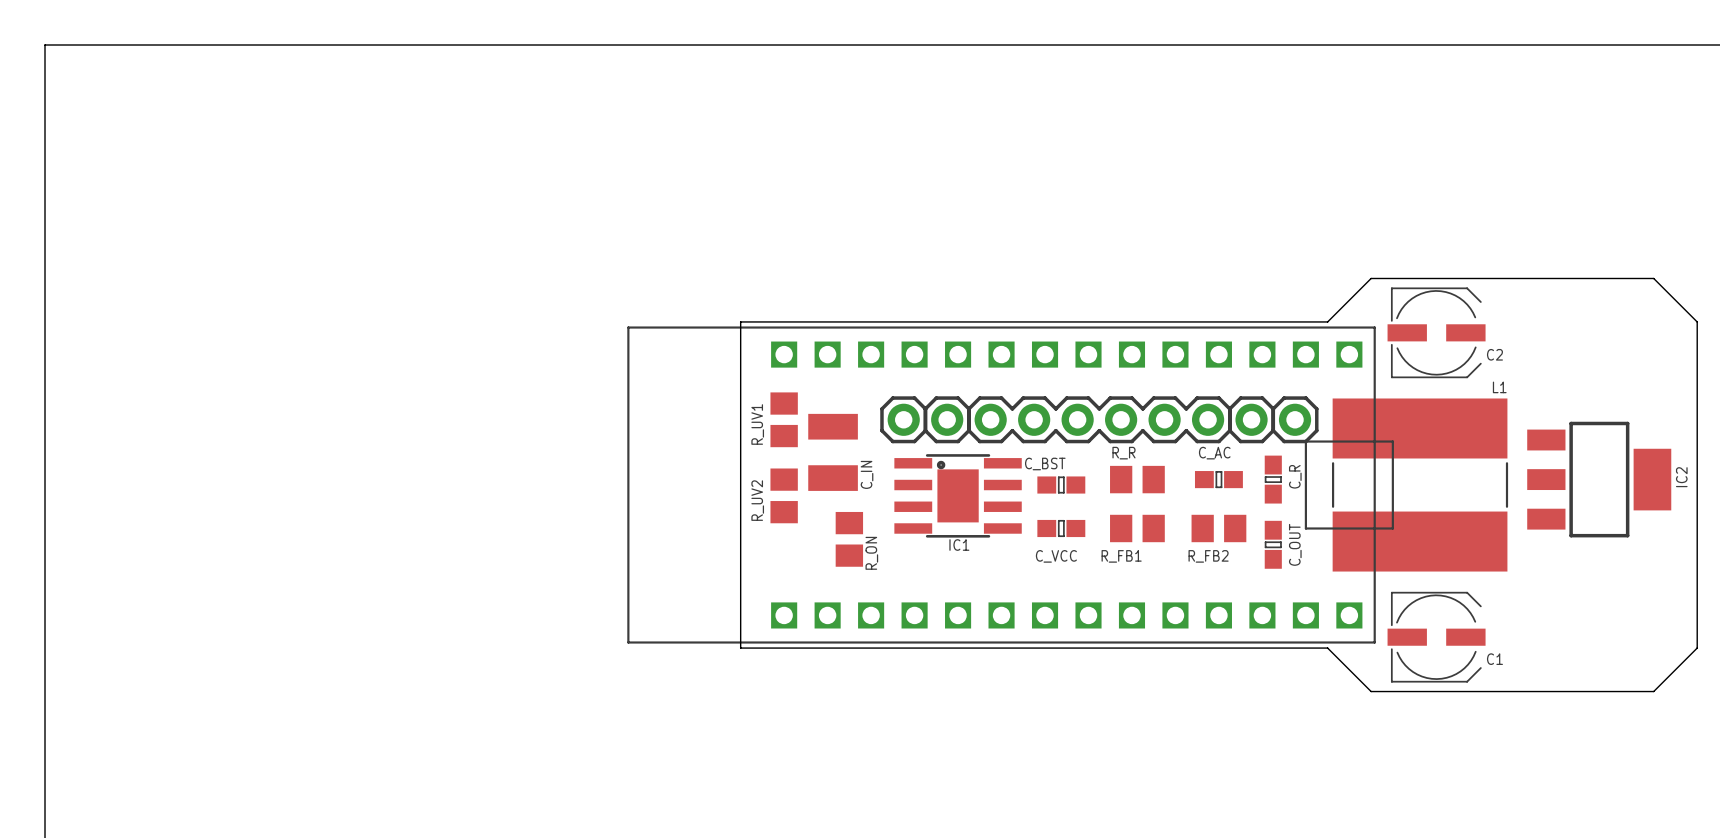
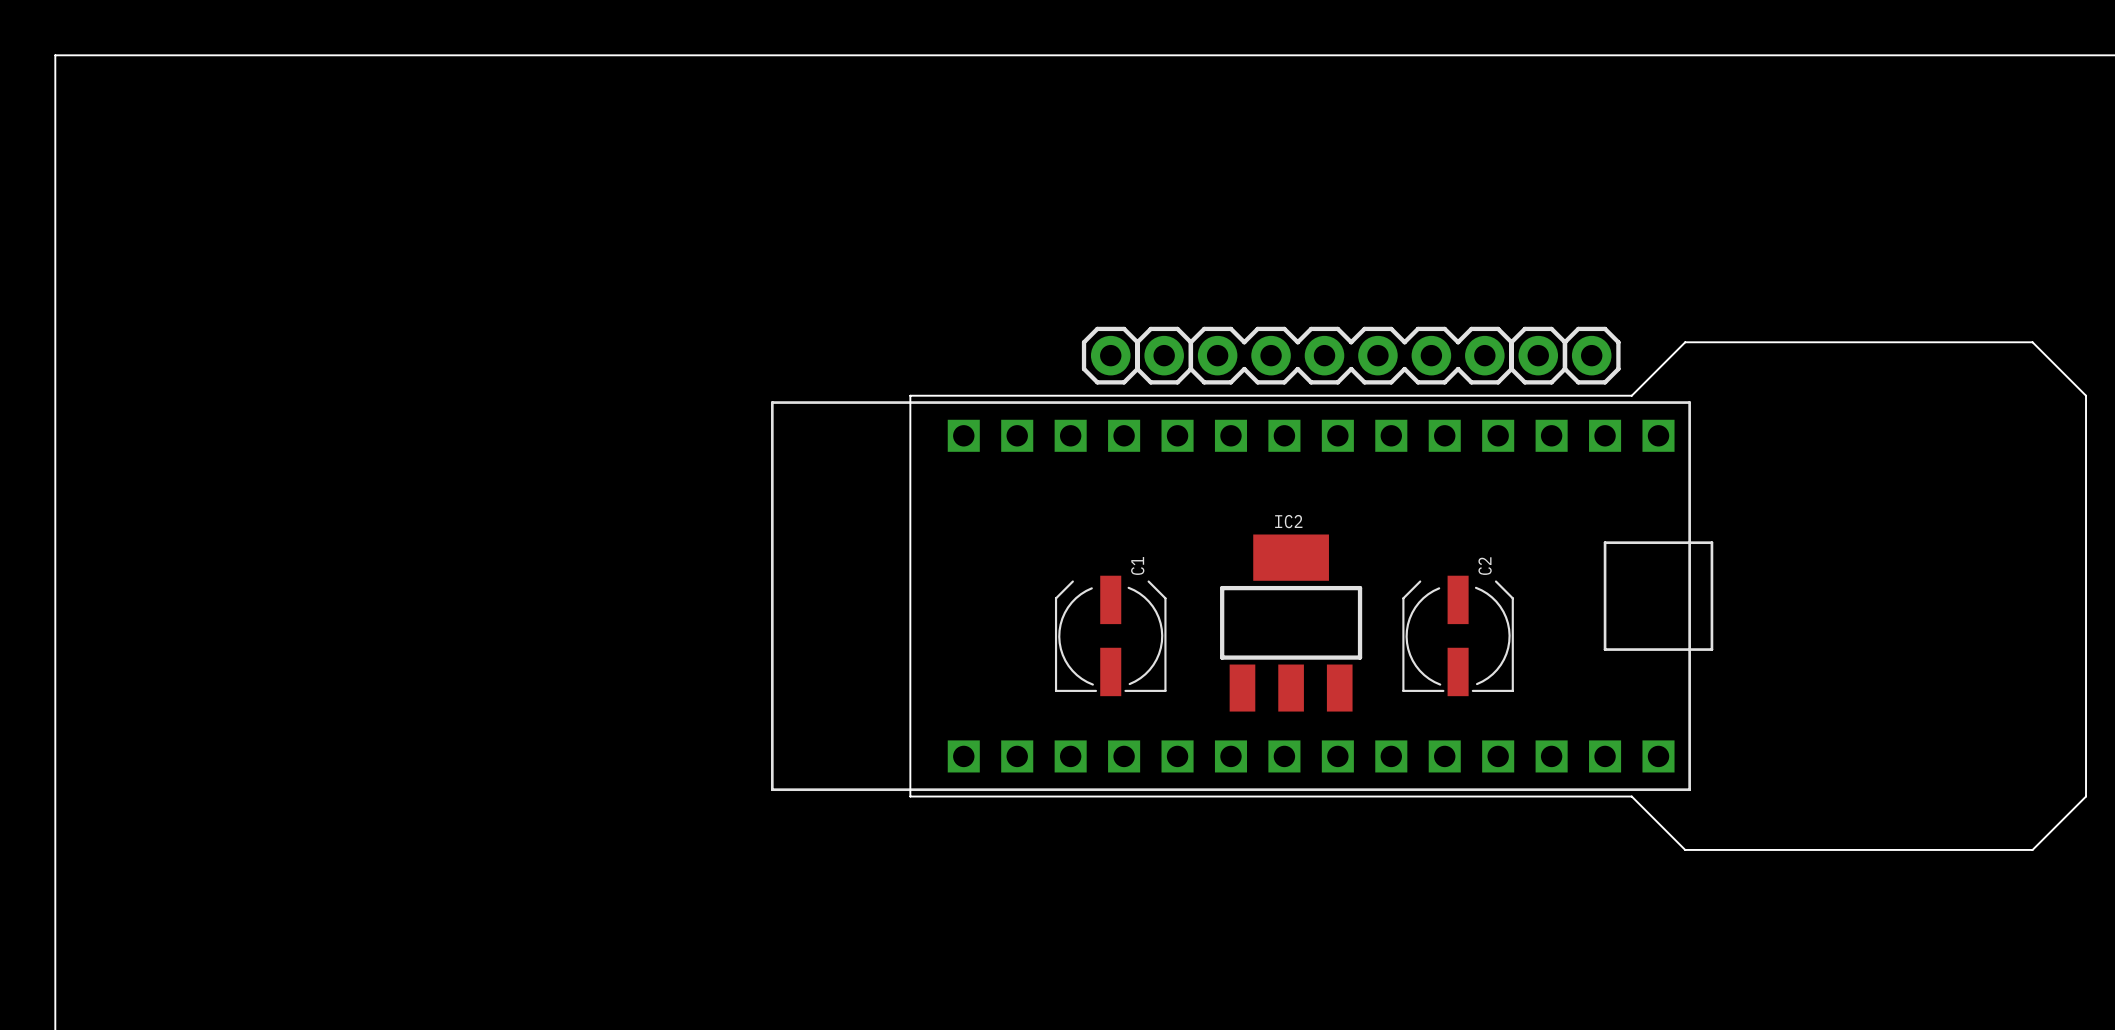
part: none -> (1110, 355)
part: none -> (1164, 355)
part: none -> (1538, 355)
part: none -> (1591, 355)
C2 rotation: 0° (1436, 332) -> 90° counterclockwise (1458, 635)
C2 position: (1436, 332) -> (1458, 635)
R_UV1: (784, 419) -> none
part: (903, 419) -> none
part: (947, 419) -> none
part position: (1099, 419) -> (1351, 355)
part: (1251, 419) -> none
part: (1295, 419) -> none
C_IN: (833, 452) -> none
R_R: (1137, 479) -> none
C_AC: (1218, 479) -> none
C_R: (1273, 479) -> none
IC2 rotation: 0° (1599, 479) -> 90° counterclockwise (1291, 623)
IC2 position: (1599, 479) -> (1291, 623)
C_BST: (1061, 485) -> none
L1: (1420, 485) -> none
R_UV2: (784, 495) -> none
IC1: (958, 495) -> none
C_VCC: (1061, 528) -> none
R_FB1: (1137, 528) -> none
R_FB2: (1218, 528) -> none
R_ON: (849, 539) -> none
C_OUT: (1273, 544) -> none
C1 rotation: 0° (1436, 637) -> 90° counterclockwise (1110, 635)
C1 position: (1436, 637) -> (1110, 635)

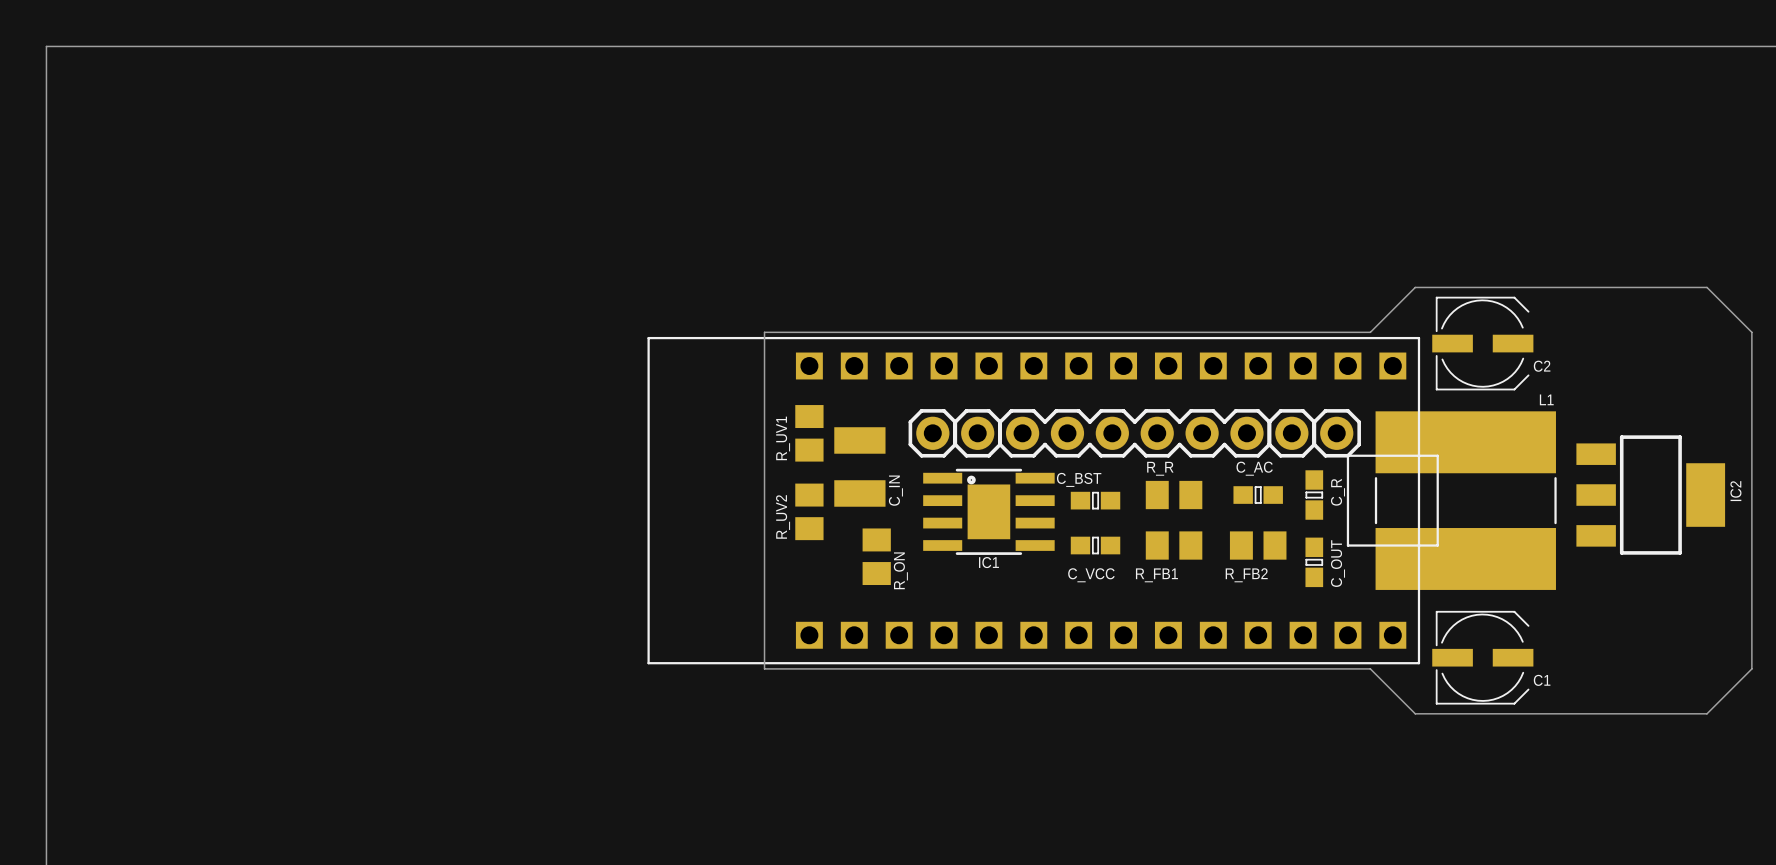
part: (1110, 355) -> none
part: (1164, 355) -> none
part position: (1351, 355) -> (1134, 433)
part: (1538, 355) -> none
part: (1591, 355) -> none
R_UV1: none -> (809, 433)
part: none -> (932, 433)
part: none -> (977, 433)
part: none -> (1291, 433)
part: none -> (1336, 433)
C_IN: none -> (859, 466)
R_R: none -> (1174, 495)
C_AC: none -> (1258, 495)
C_R: none -> (1314, 495)
C_BST: none -> (1095, 500)
L1: none -> (1465, 500)
R_UV2: none -> (809, 511)
IC1: none -> (988, 511)
IC2 rotation: 0° (1291, 623) -> 90° clockwise (1650, 495)
IC2 position: (1291, 623) -> (1650, 495)
C1 rotation: 0° (1110, 635) -> 90° clockwise (1482, 657)
C1 position: (1110, 635) -> (1482, 657)
C2 rotation: 0° (1458, 635) -> 90° clockwise (1482, 343)
C2 position: (1458, 635) -> (1482, 343)
C_VCC: none -> (1095, 545)
R_FB1: none -> (1174, 545)
R_FB2: none -> (1258, 545)
R_ON: none -> (876, 556)
C_OUT: none -> (1314, 562)

